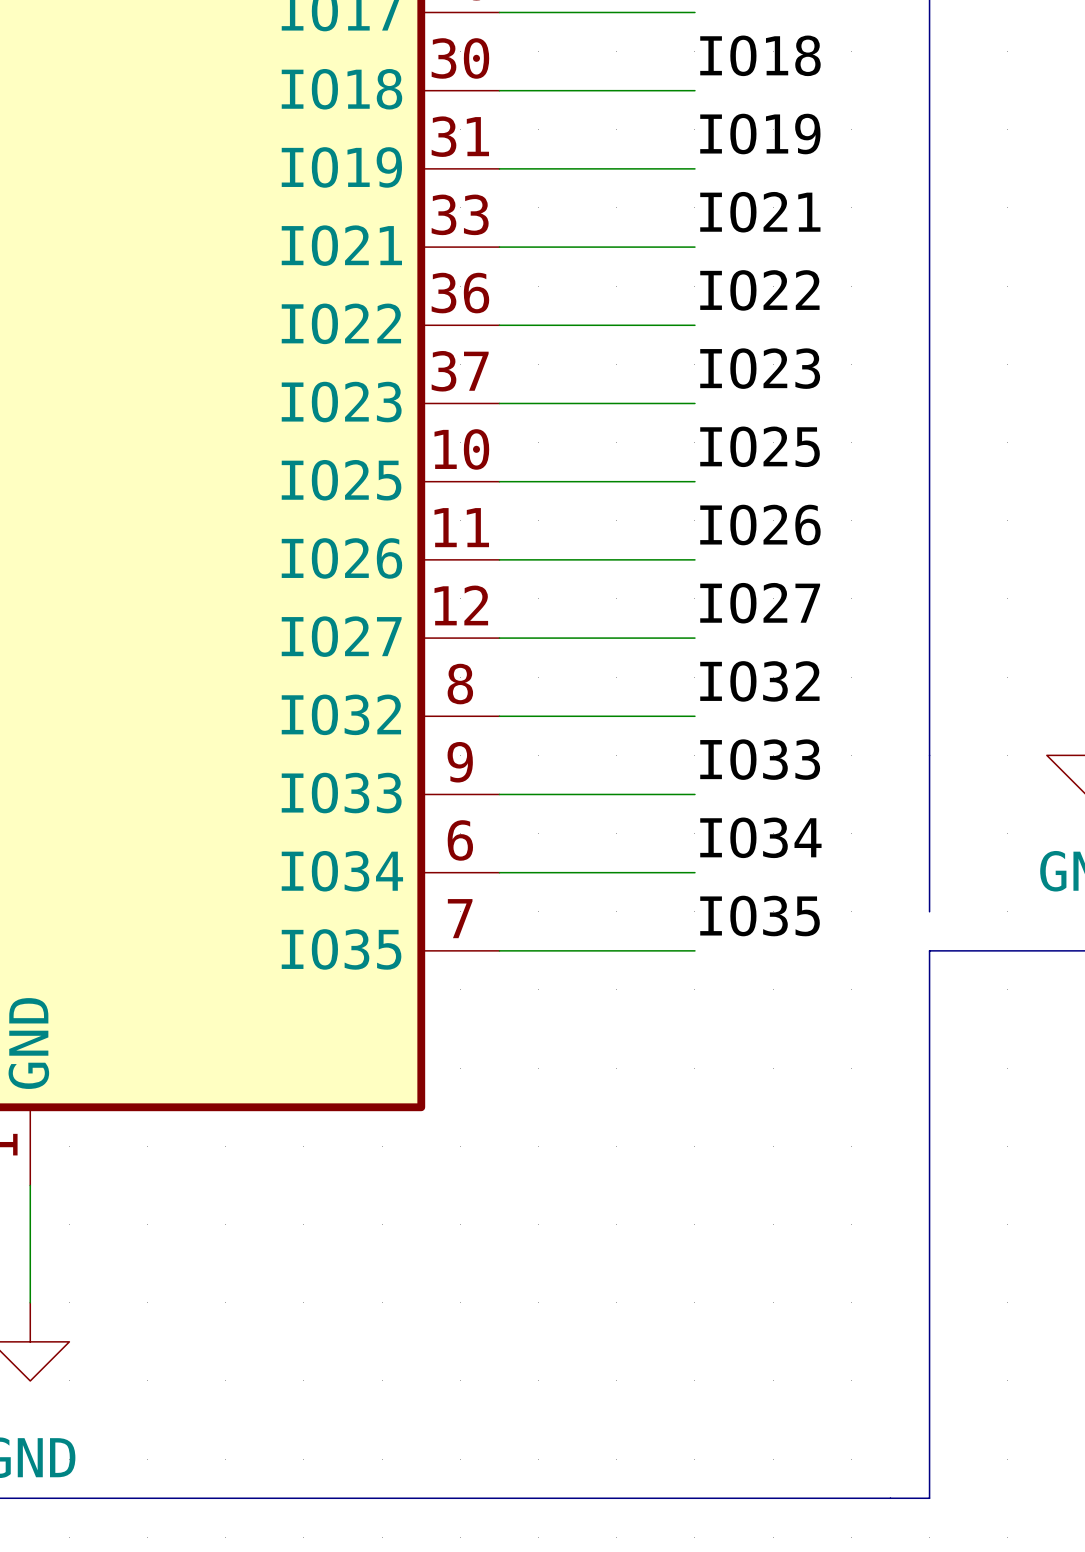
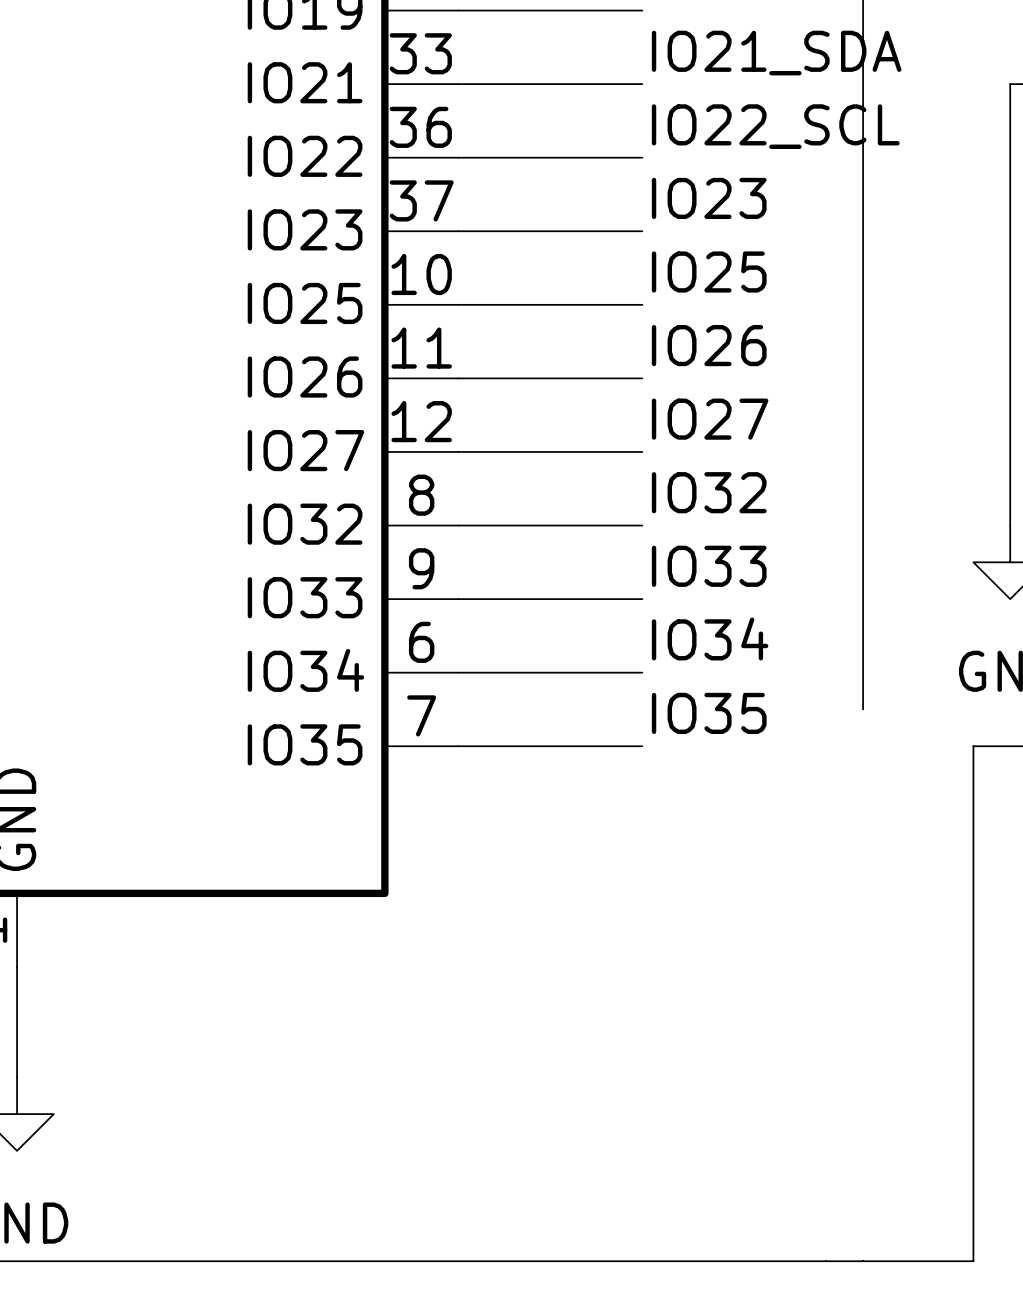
label: IO21 (760, 212) -> IO21_SDA (776, 53)
label: IO22 (759, 290) -> IO22_SCL (775, 126)
line: (1046, 950) (929, 950) (929, 1498) -> (973, 746) (973, 1261) (863, 1261)

